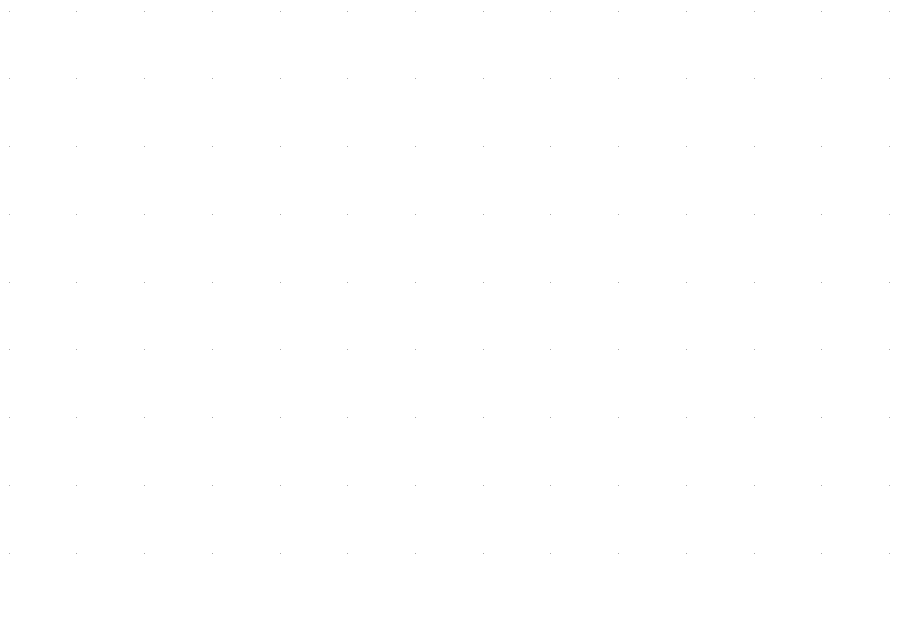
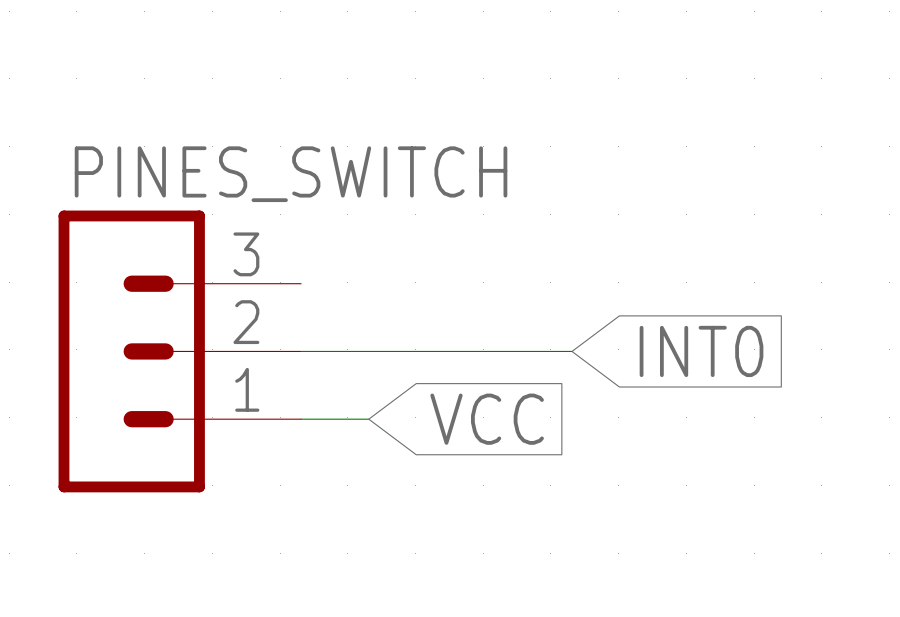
PINES_SWITCH: none -> (179, 351)
wire: none -> (301, 351) (572, 351)
global label: none -> INT0 (701, 351)
wire: none -> (301, 419) (368, 419)
global label: none -> VCC (487, 419)

